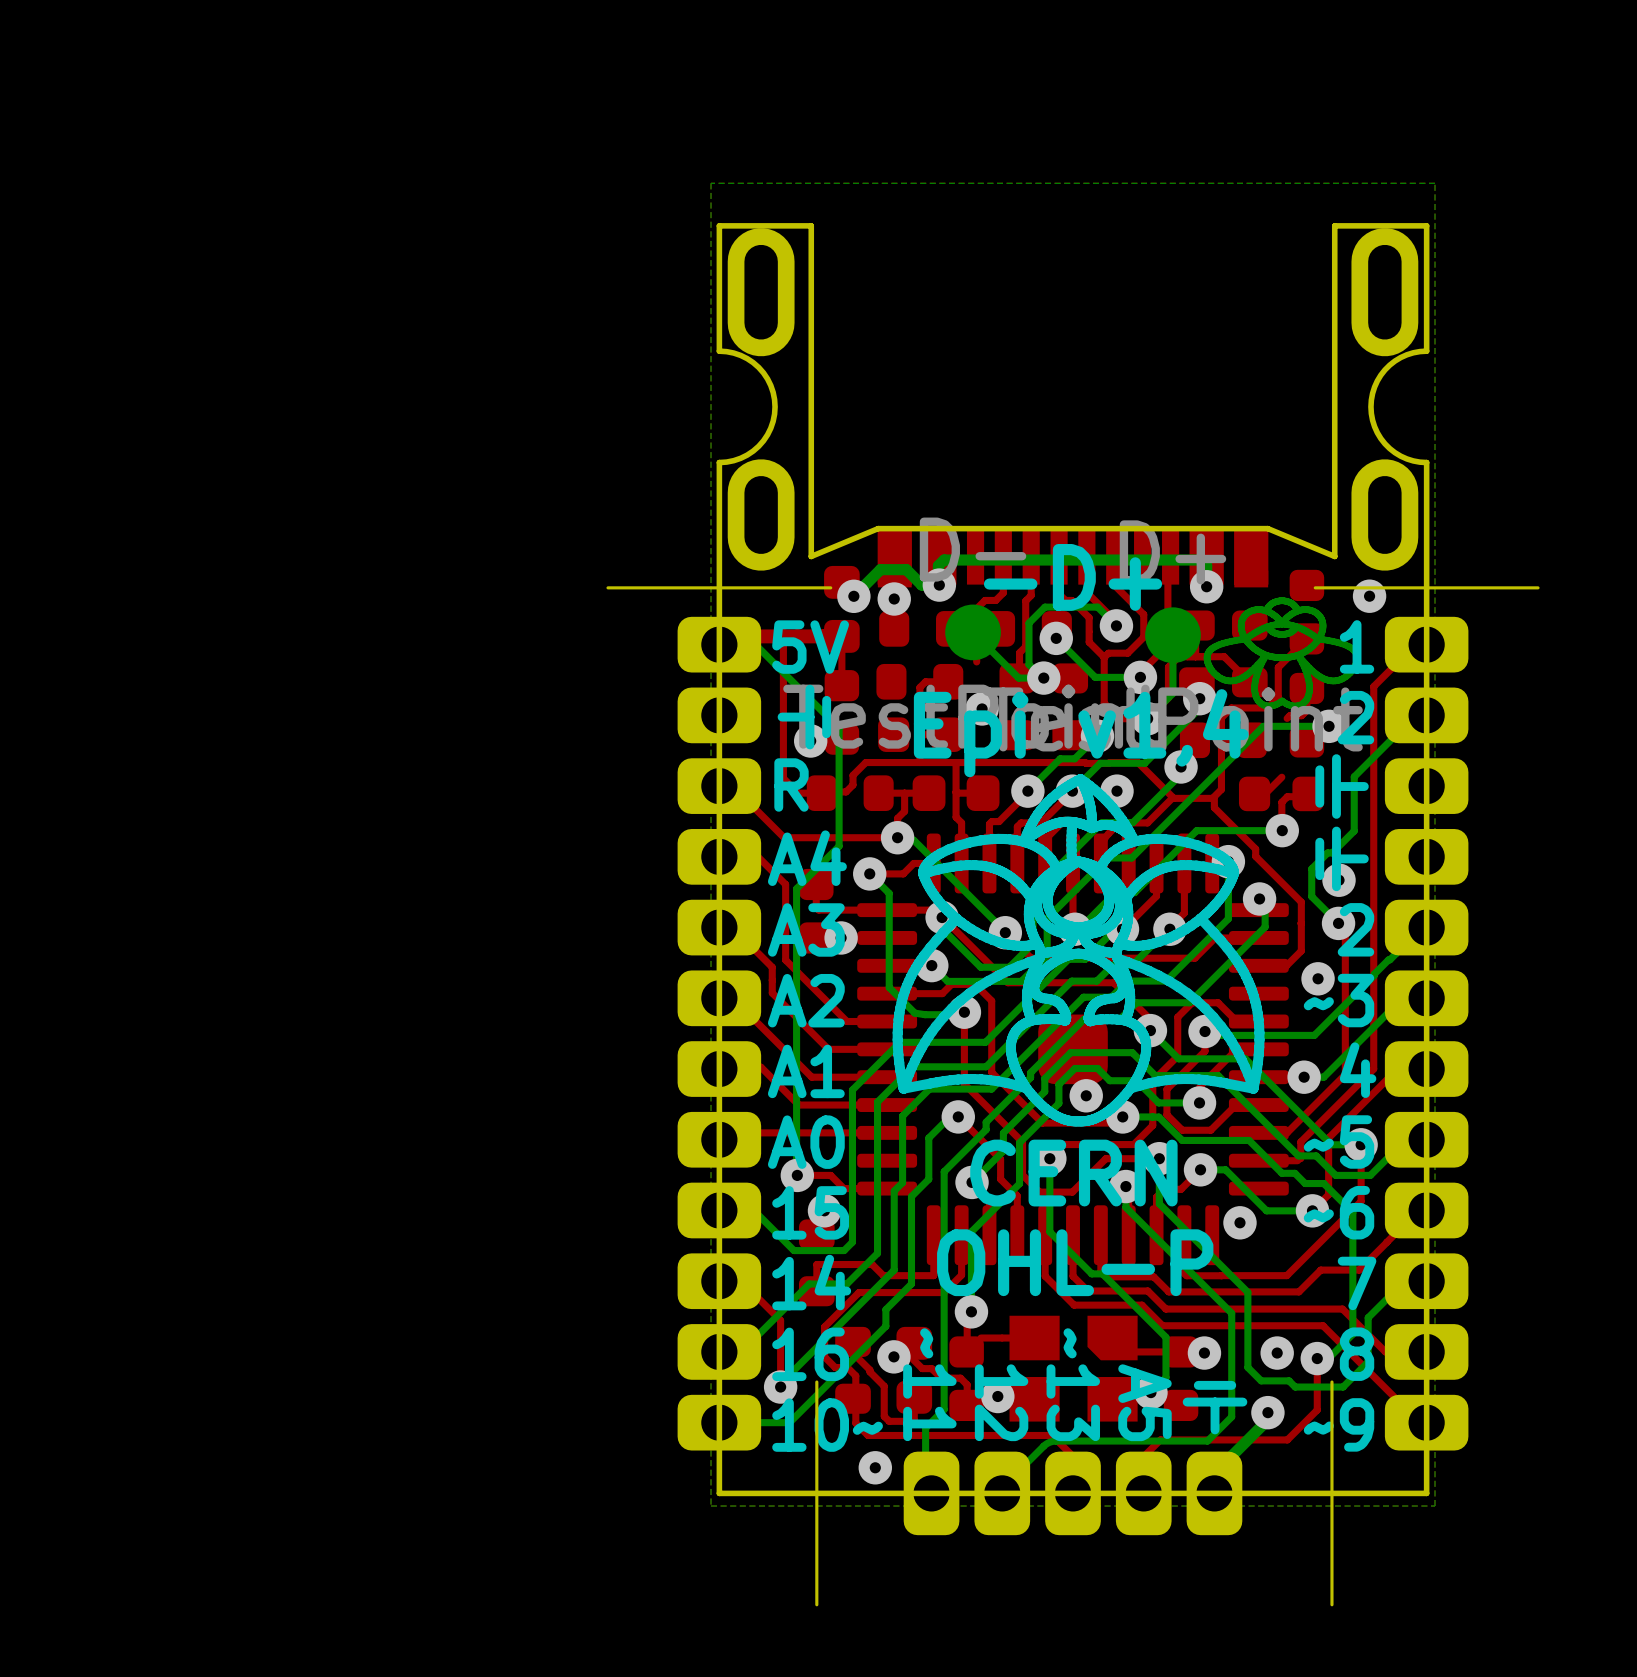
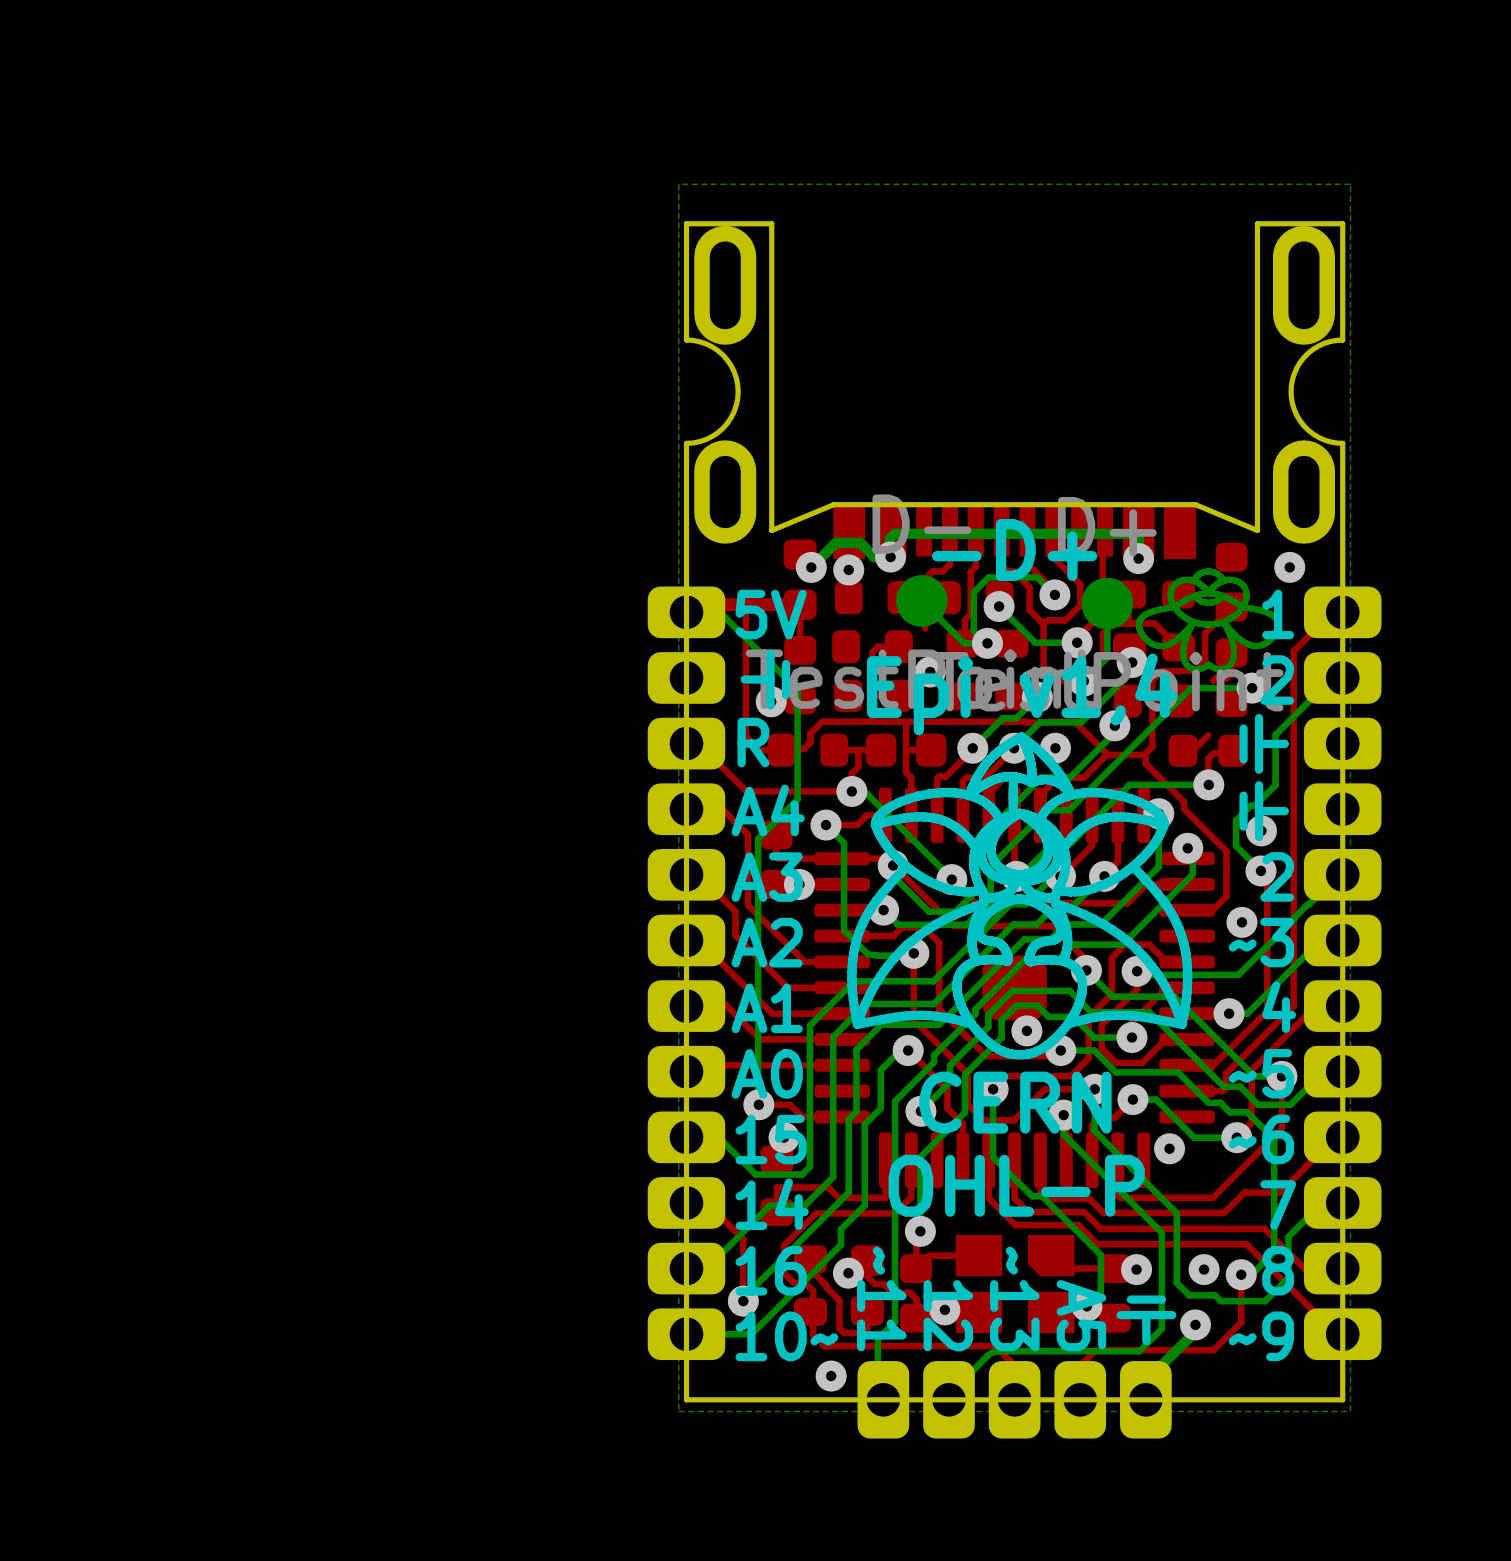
board edge: (830, 587) (607, 587) -> none
board edge: (1538, 587) (1315, 587) -> none
board edge: (816, 1382) (816, 1604) -> none
board edge: (1331, 1382) (1331, 1604) -> none

